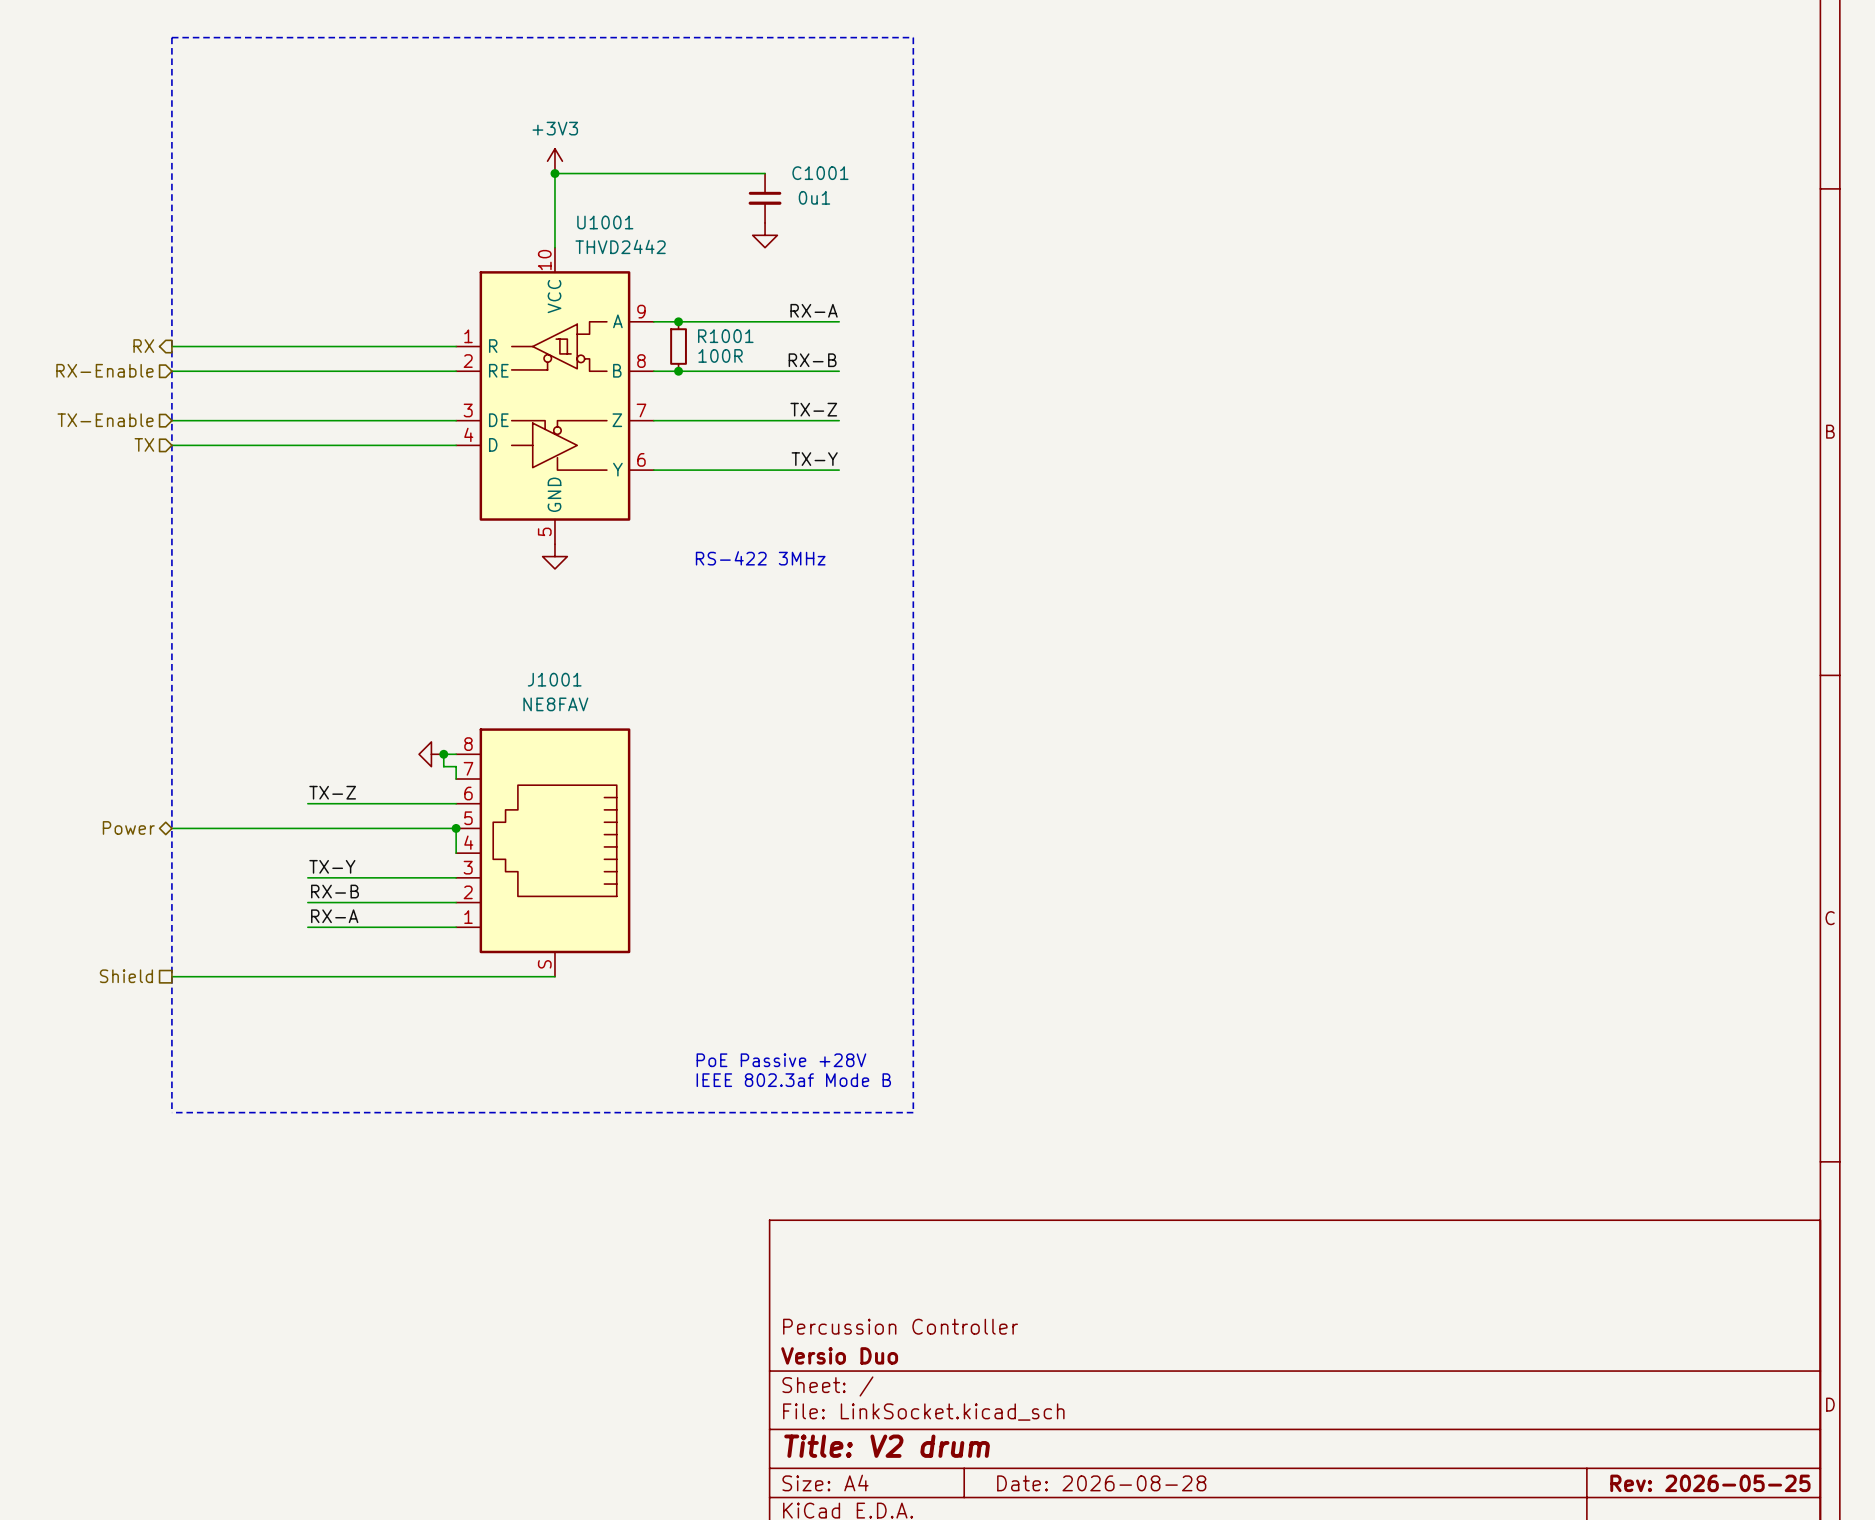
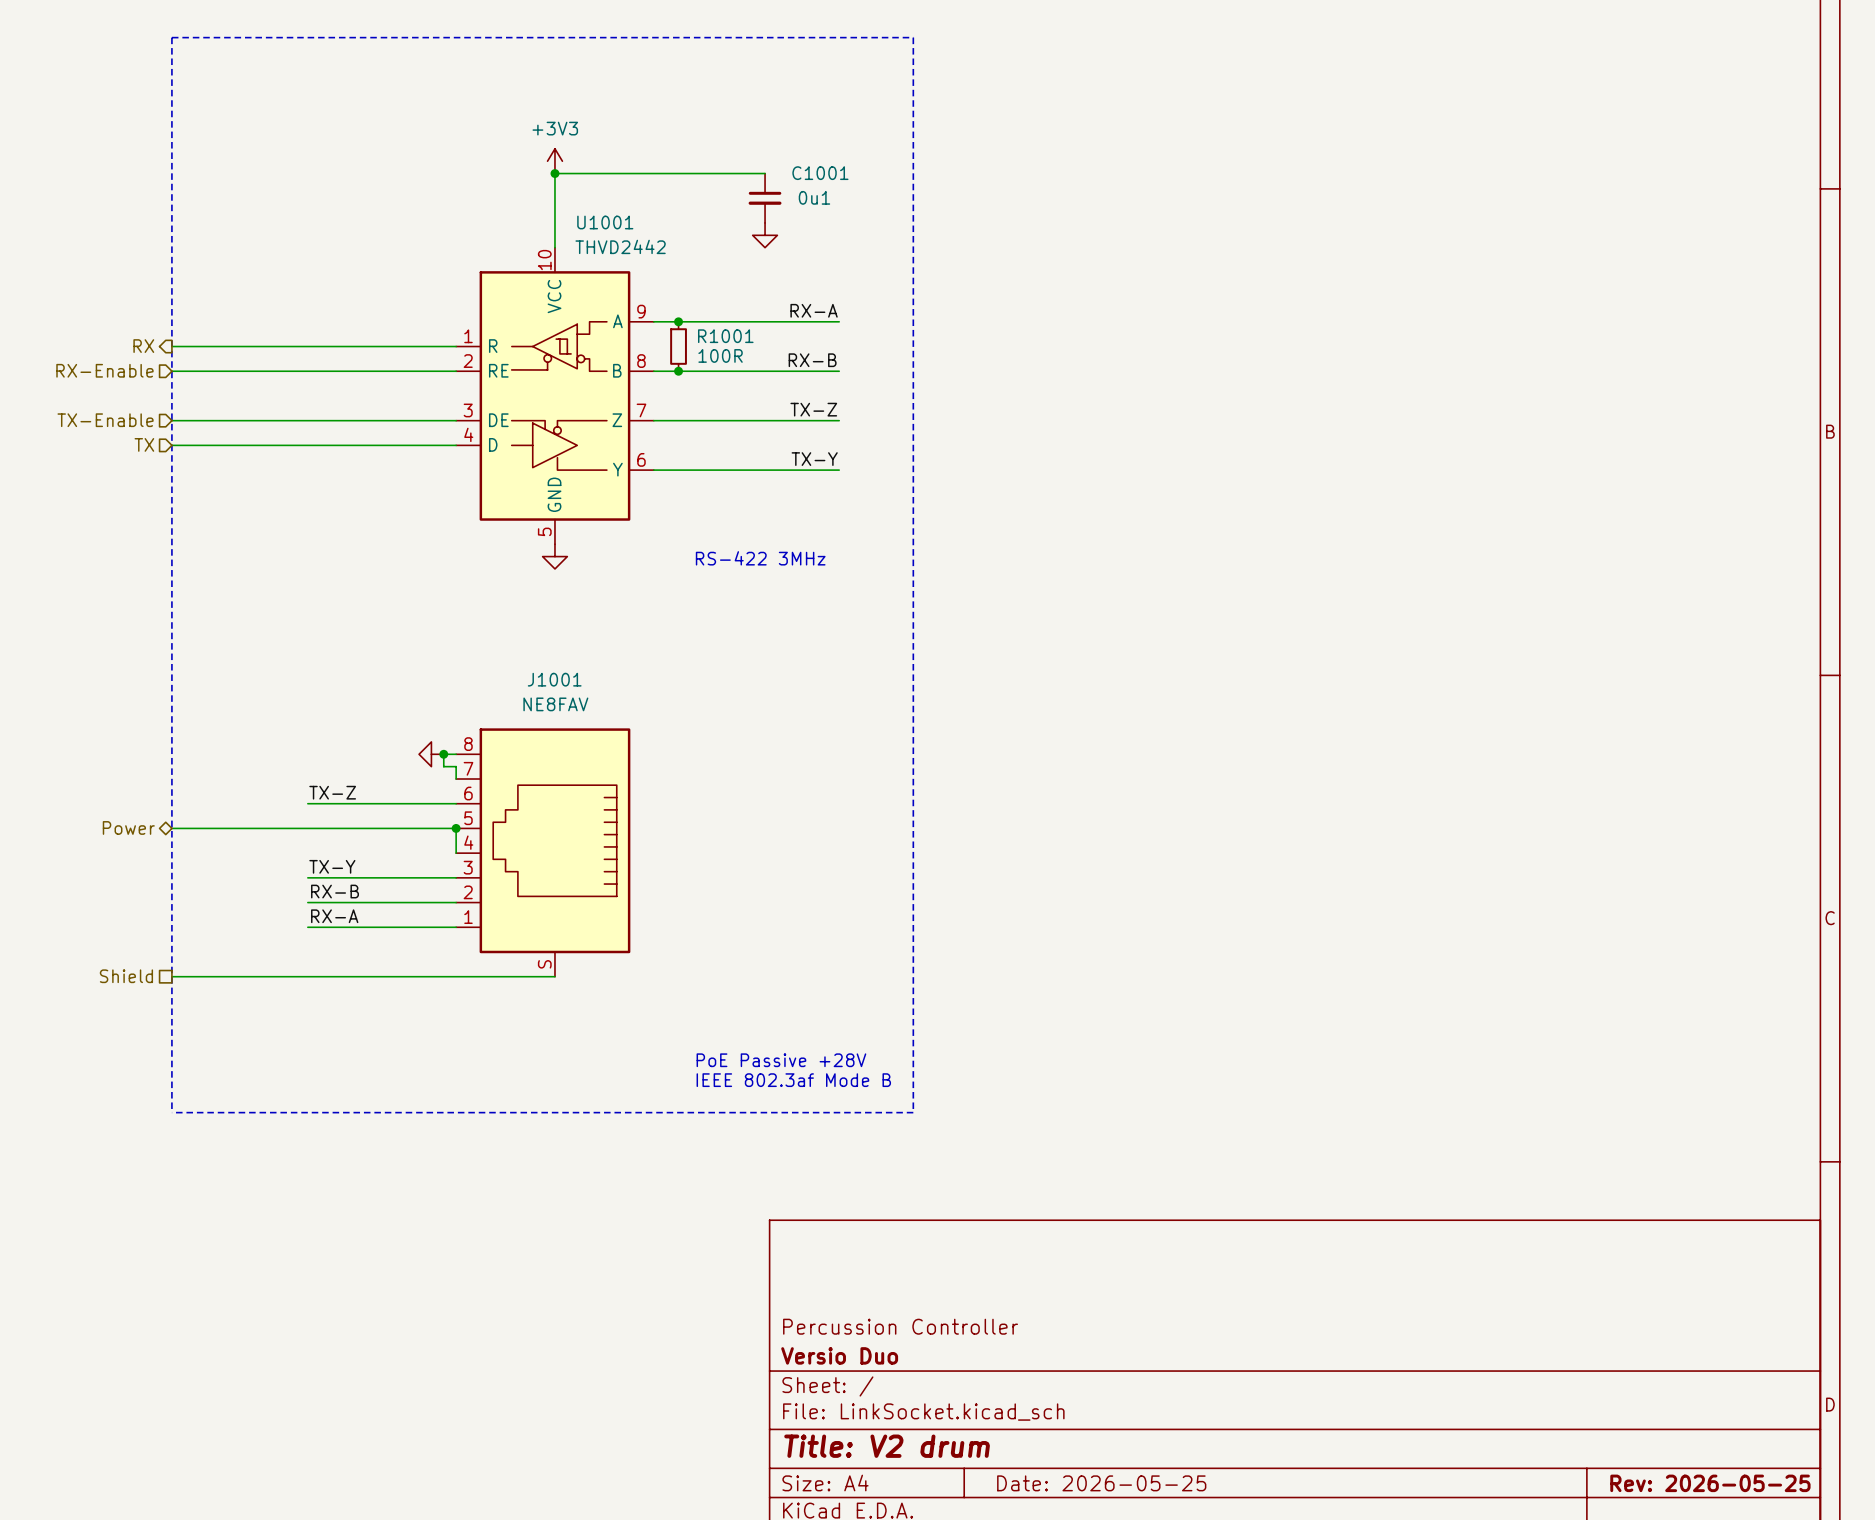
title block: Date: 2026-08-28 (1101, 1483) -> Date: 2026-05-25 (1101, 1483)

